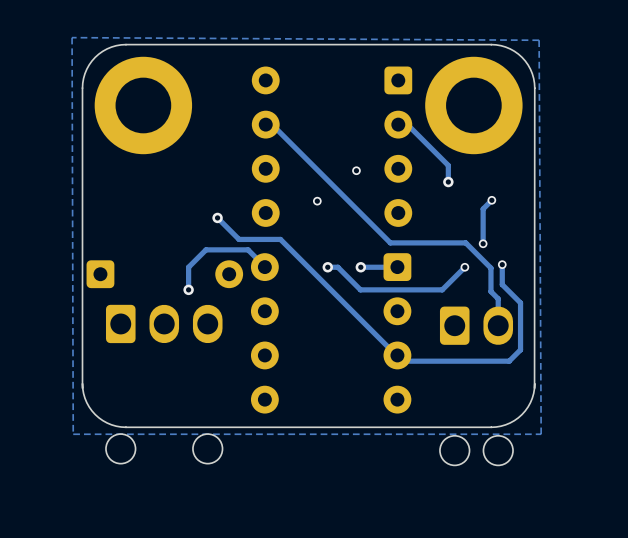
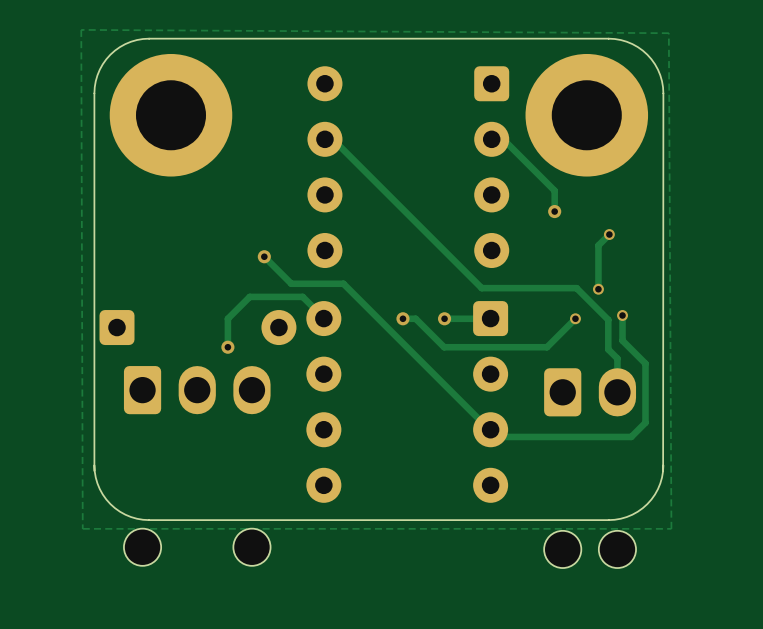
via: (356, 170) -> none
via: (317, 201) -> none

